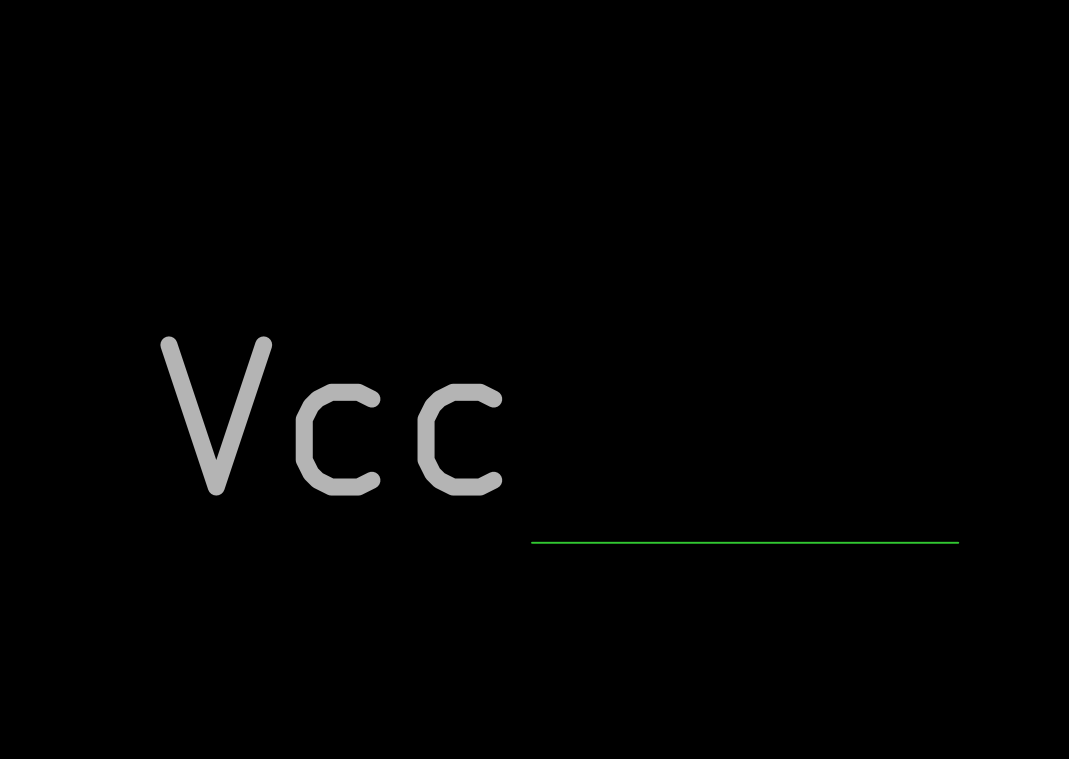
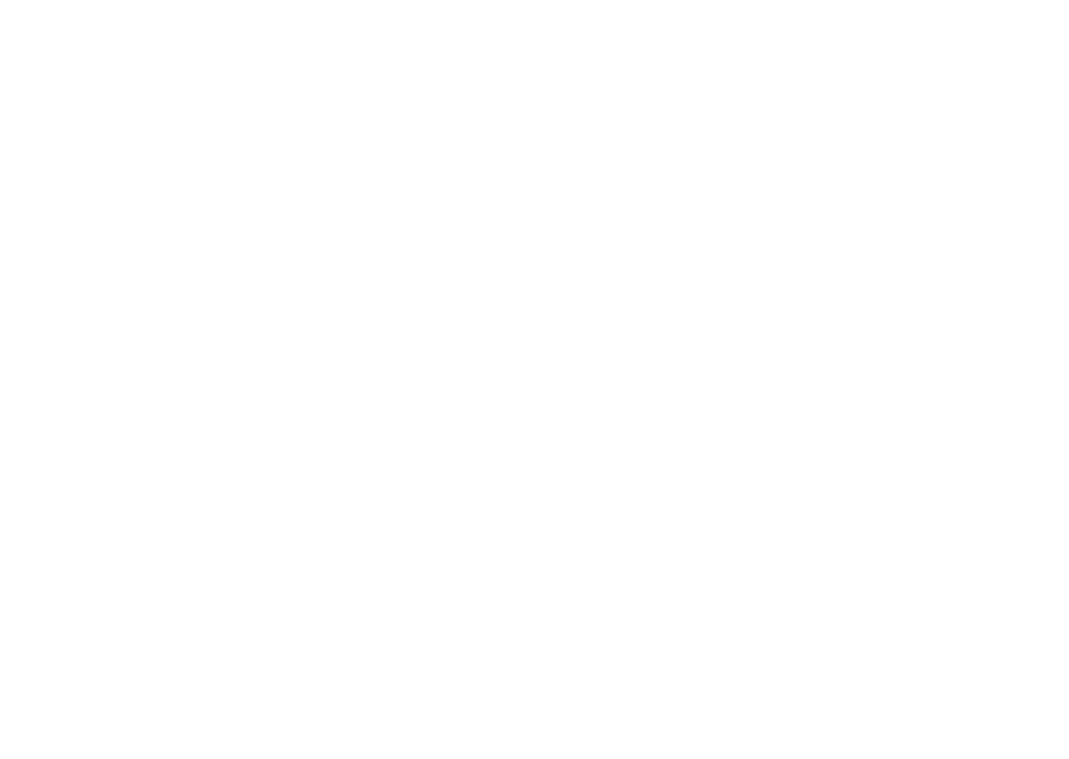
label: Vcc (331, 415) -> none
wire: (531, 542) (958, 542) -> none

